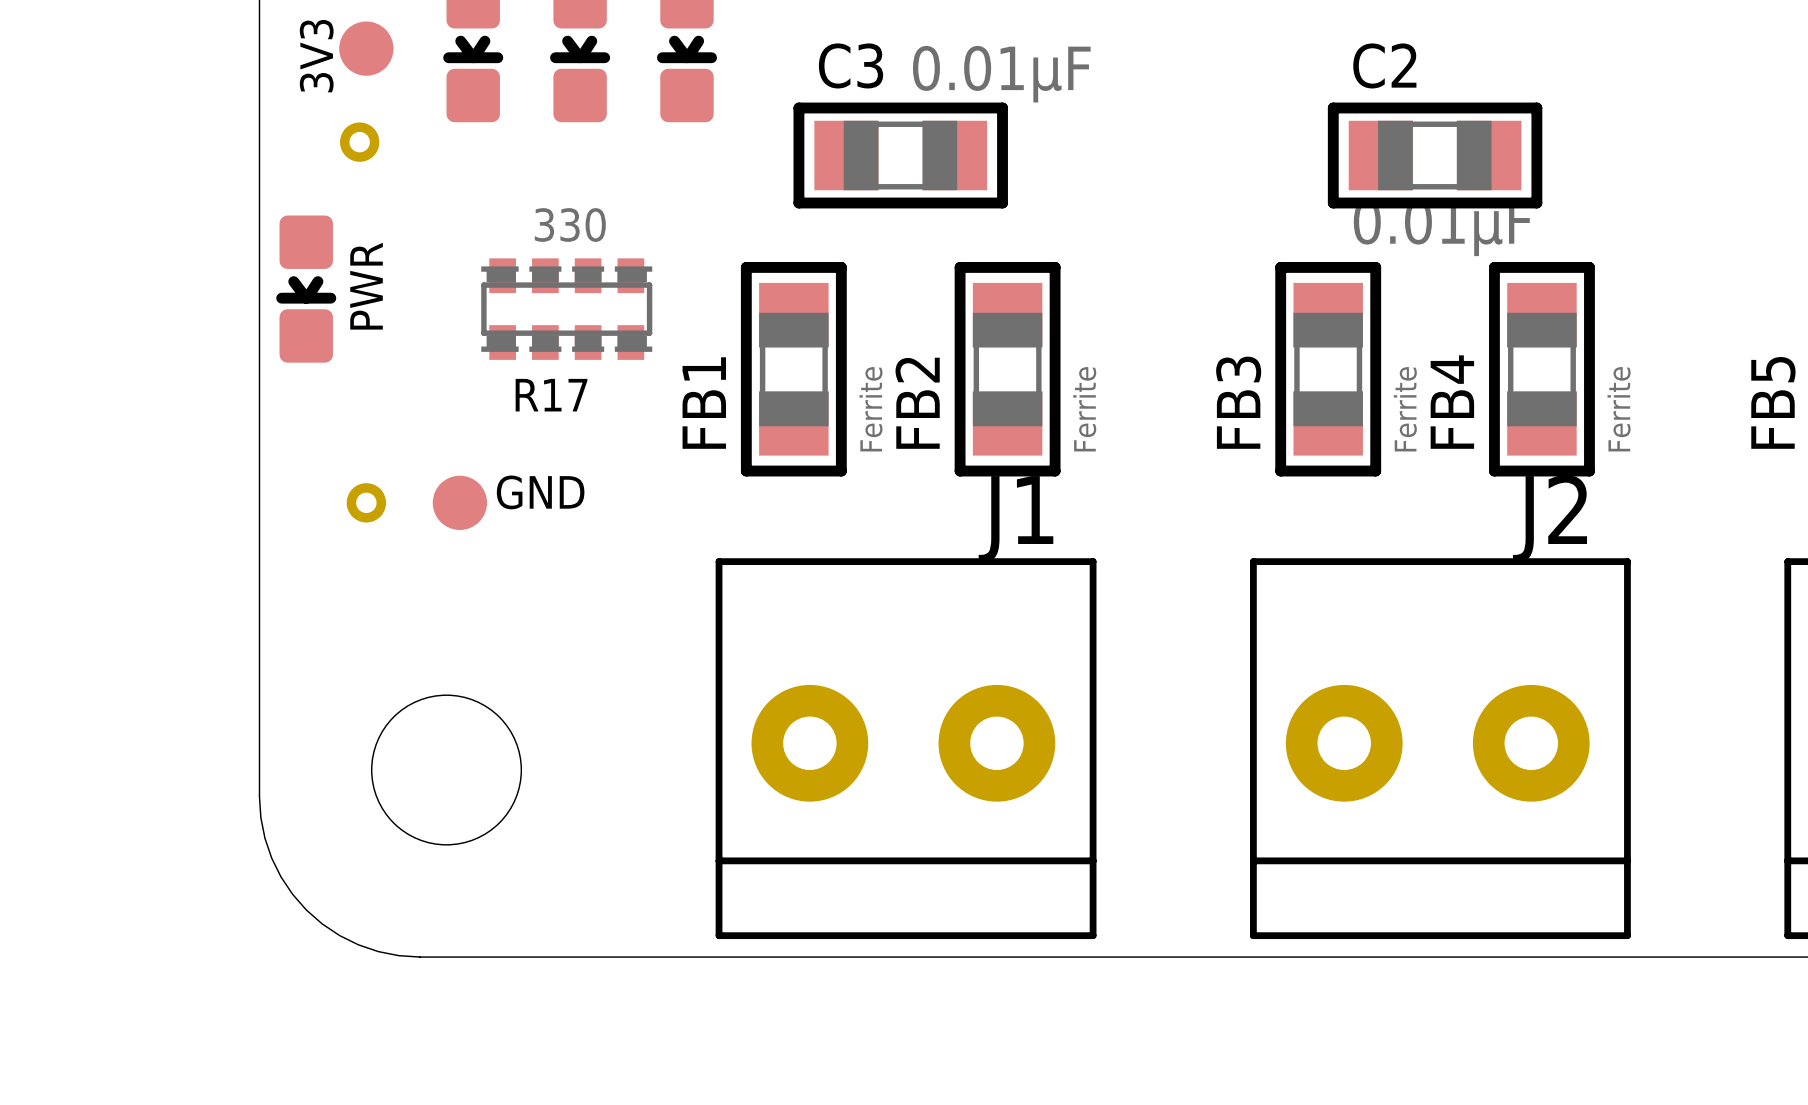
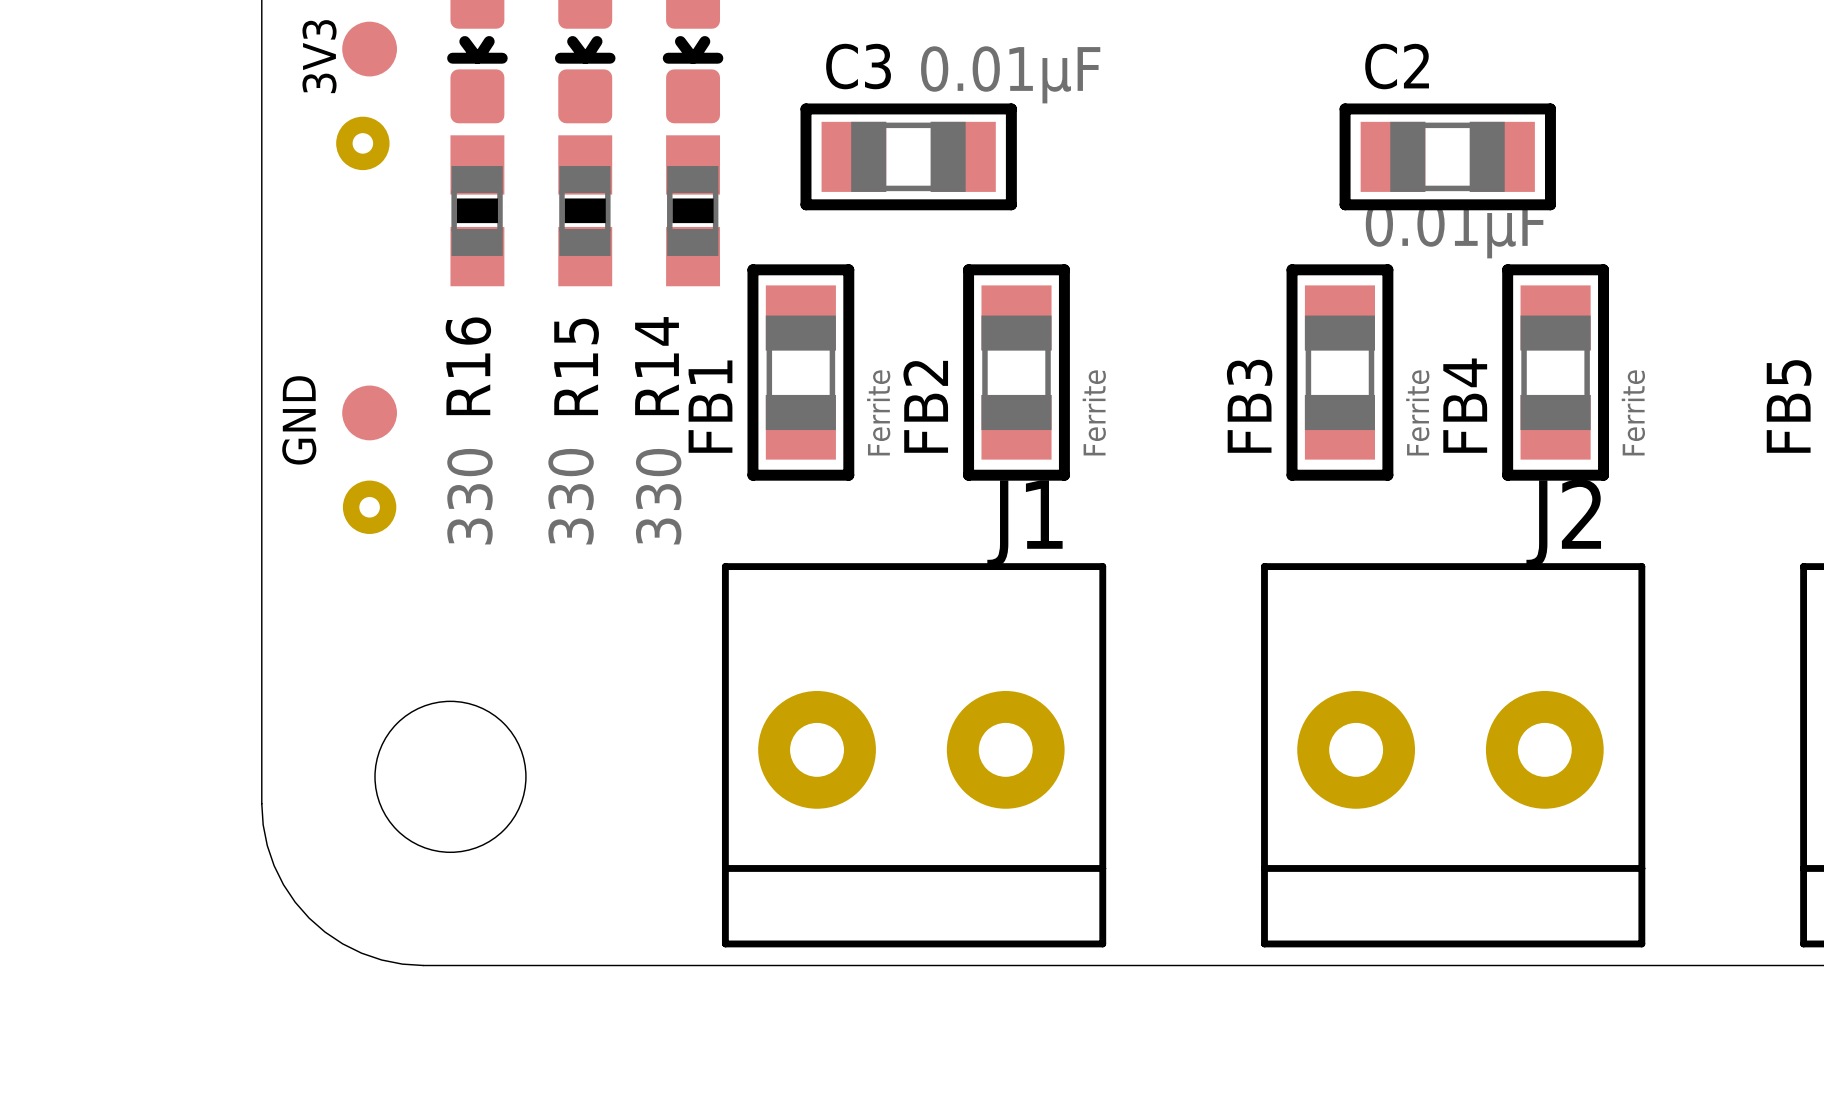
part footprint: [340, 122, 380, 162] -> [336, 116, 390, 171]
R16: none -> 330 (477, 210)
R15: none -> 330 (585, 210)
R14: none -> 330 (693, 210)
PWR: (306, 289) -> none
R17: 330 (566, 309) -> none
part footprint: [346, 483, 387, 523] -> [342, 480, 397, 534]
text rotation: 0° (540, 492) -> 90° counterclockwise (299, 420)
text position: GND (540, 492) -> GND (299, 420)
part position: (459, 502) -> (369, 412)

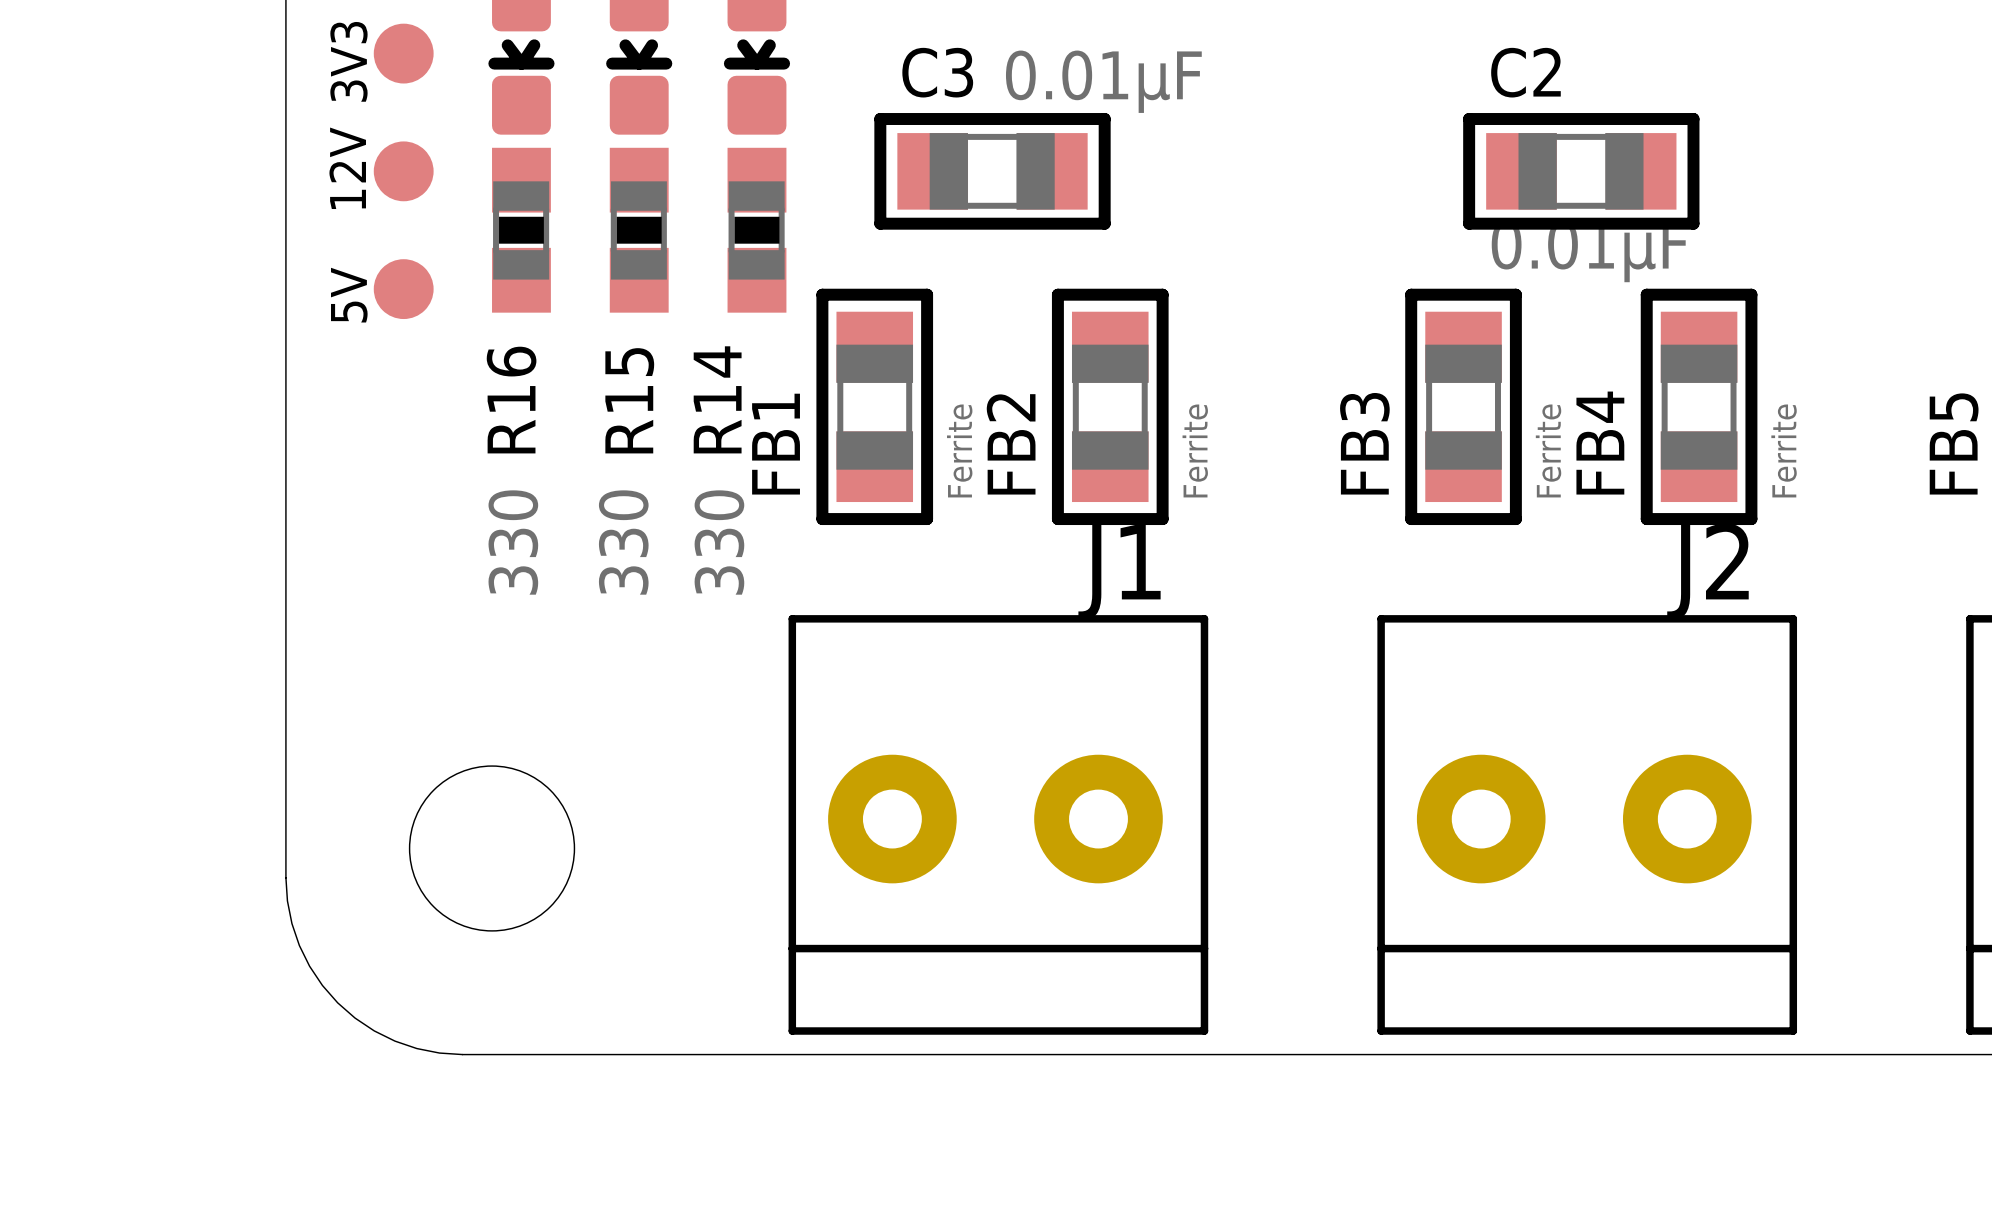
part footprint: [336, 116, 390, 171] -> [373, 141, 434, 202]
text: none -> 12V (347, 168)
text: none -> 5V (349, 295)
part position: (369, 412) -> (403, 289)
text: GND (299, 420) -> none
part: (369, 507) -> none

